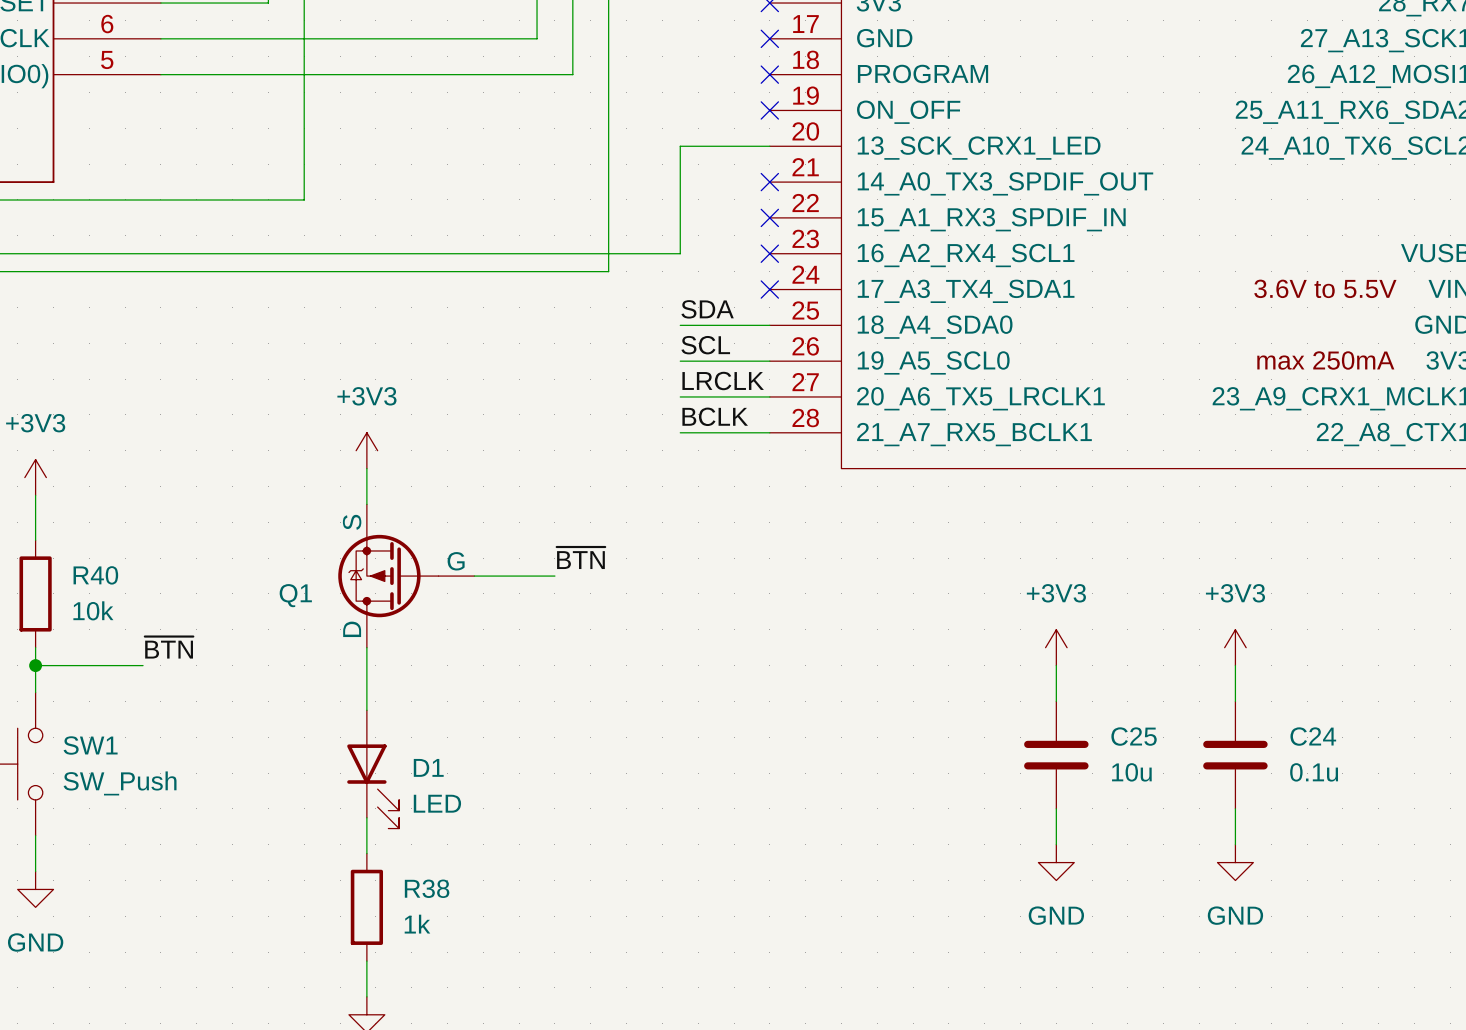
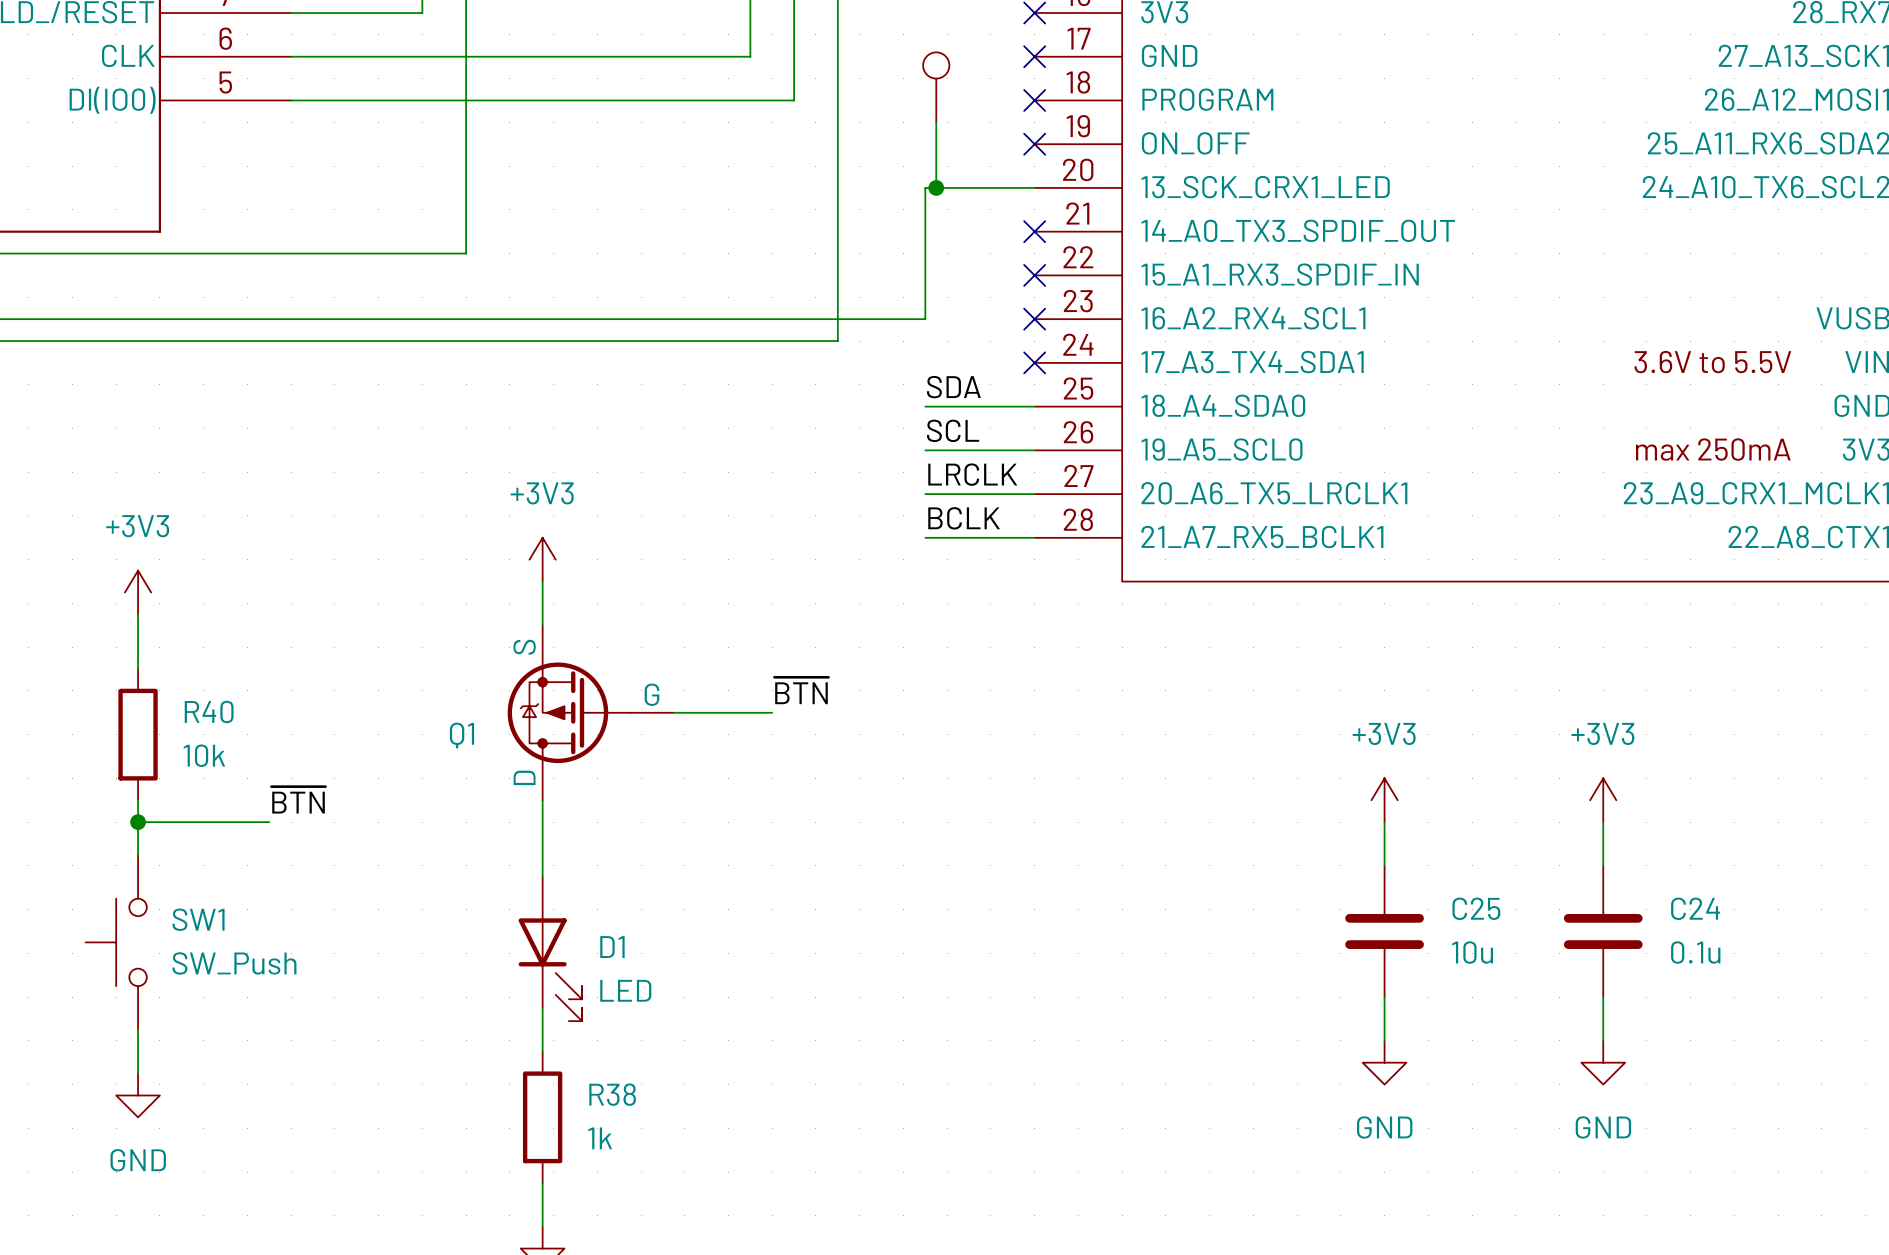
part: none -> (936, 87)
wire: none -> (936, 122) (936, 187)
junction: none -> (936, 187)

